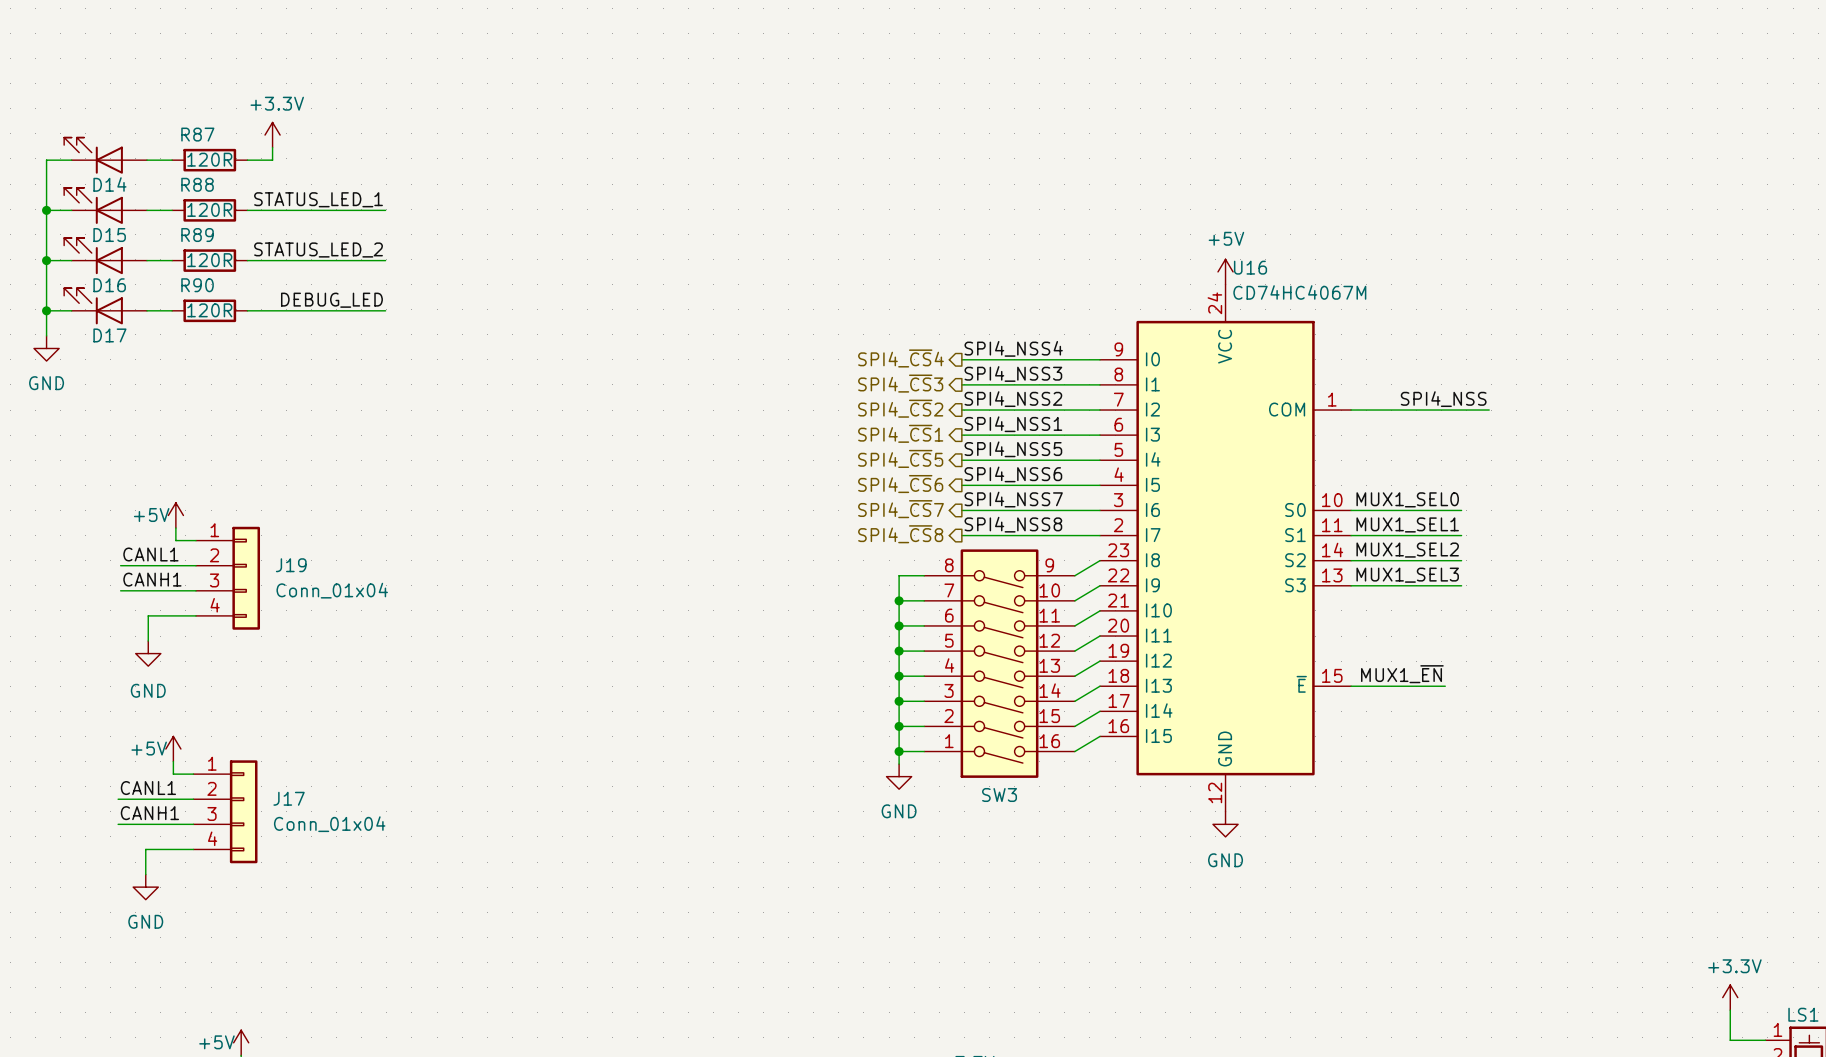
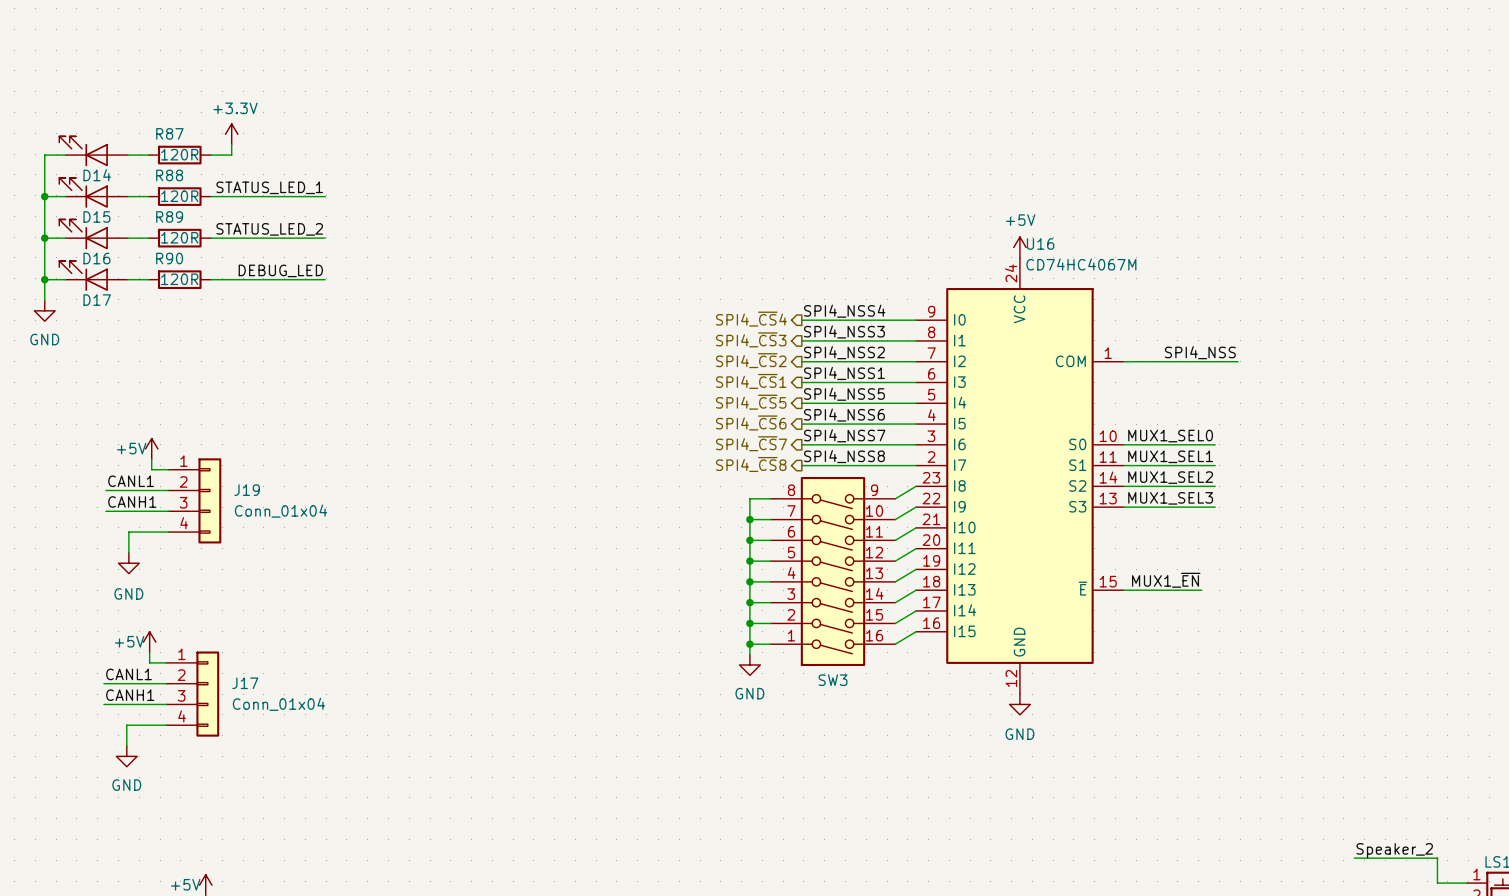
power symbol: +3.3V (1730, 997) -> none
label: none -> Speaker_2 (1394, 850)
wire: none -> (1354, 858) (1437, 858)

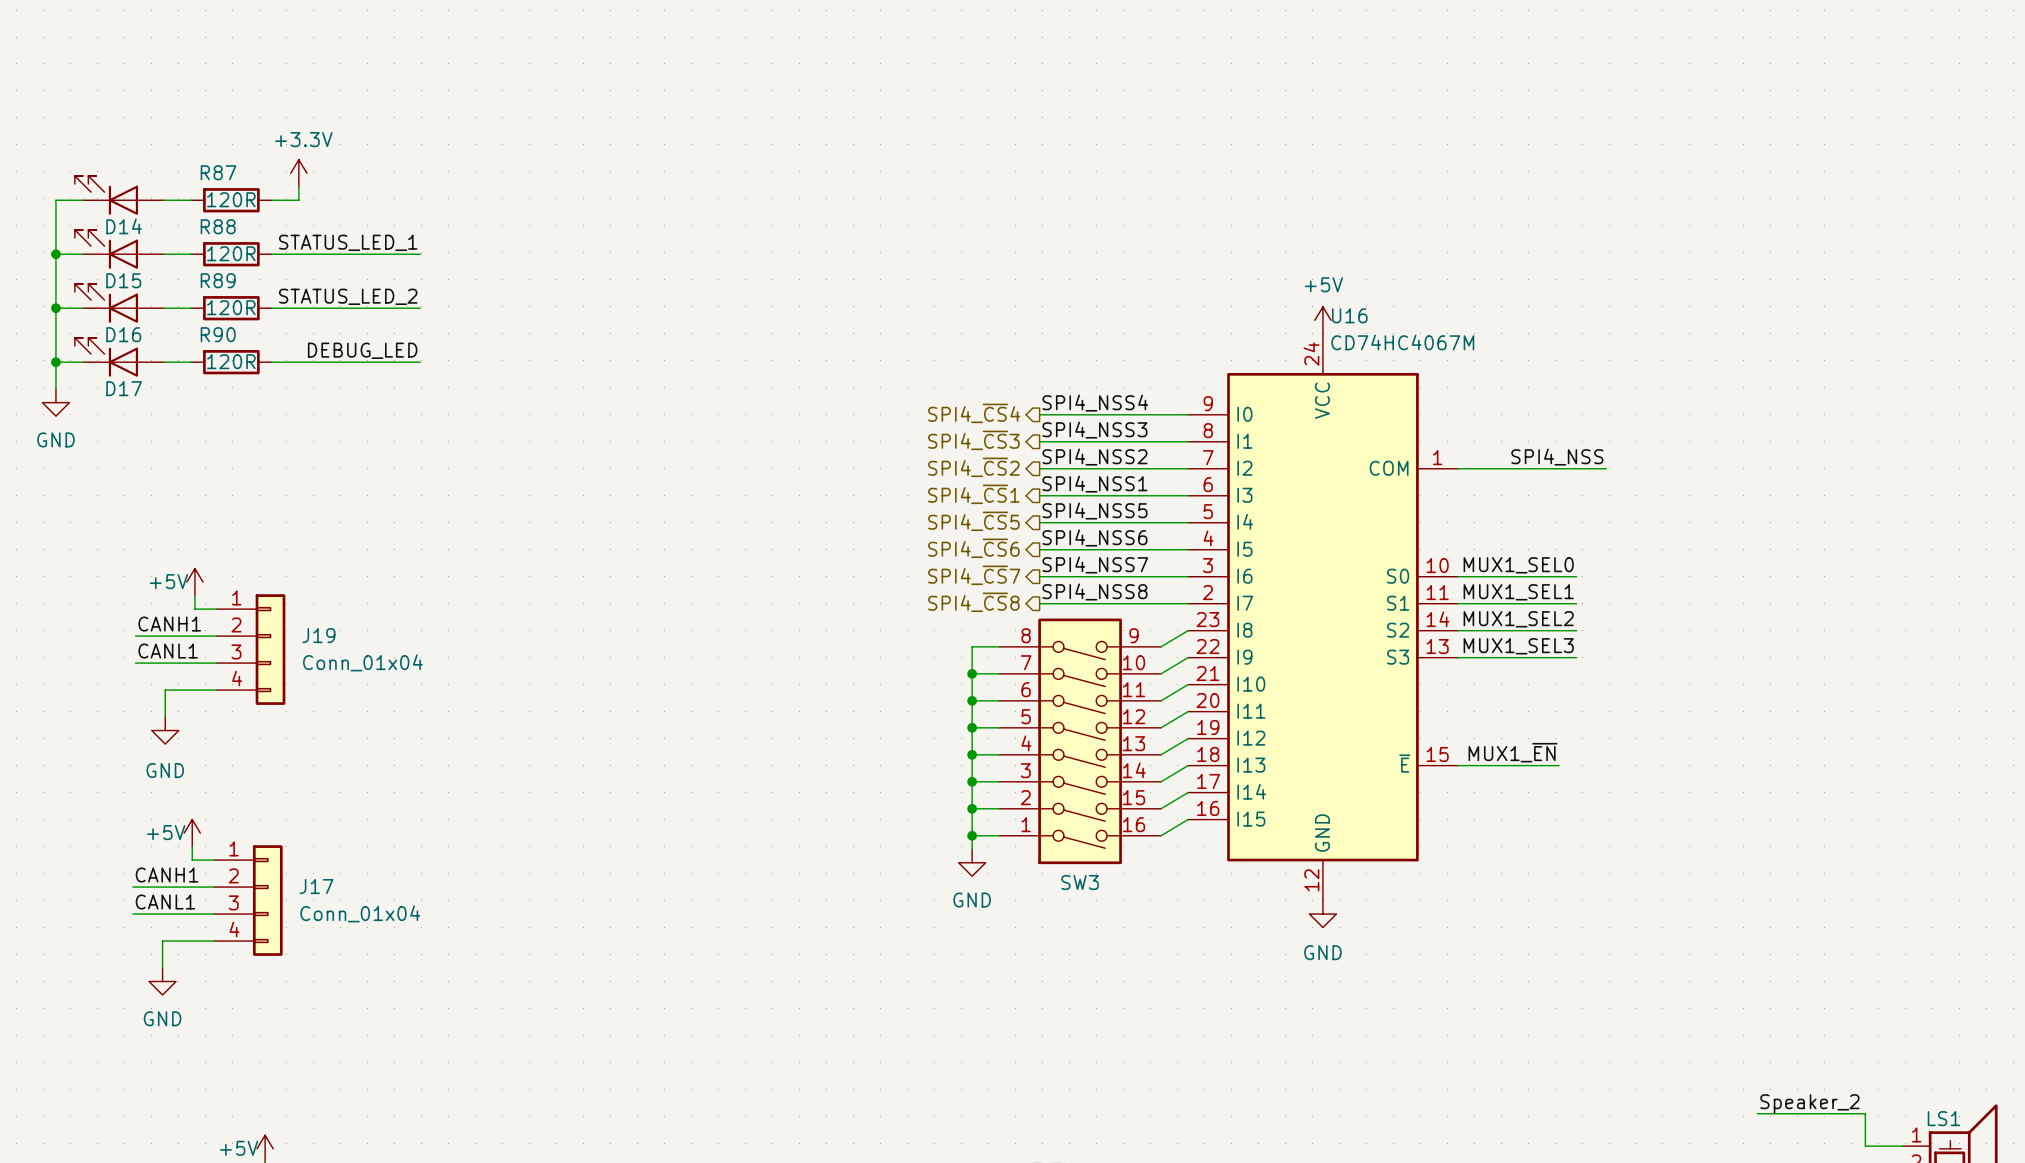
label: CANL1 (131, 481) -> CANH1 (169, 624)
label: CANH1 (132, 502) -> CANL1 (168, 651)
label: CANL1 (129, 674) -> CANH1 (167, 875)
label: CANH1 (130, 695) -> CANL1 (165, 902)

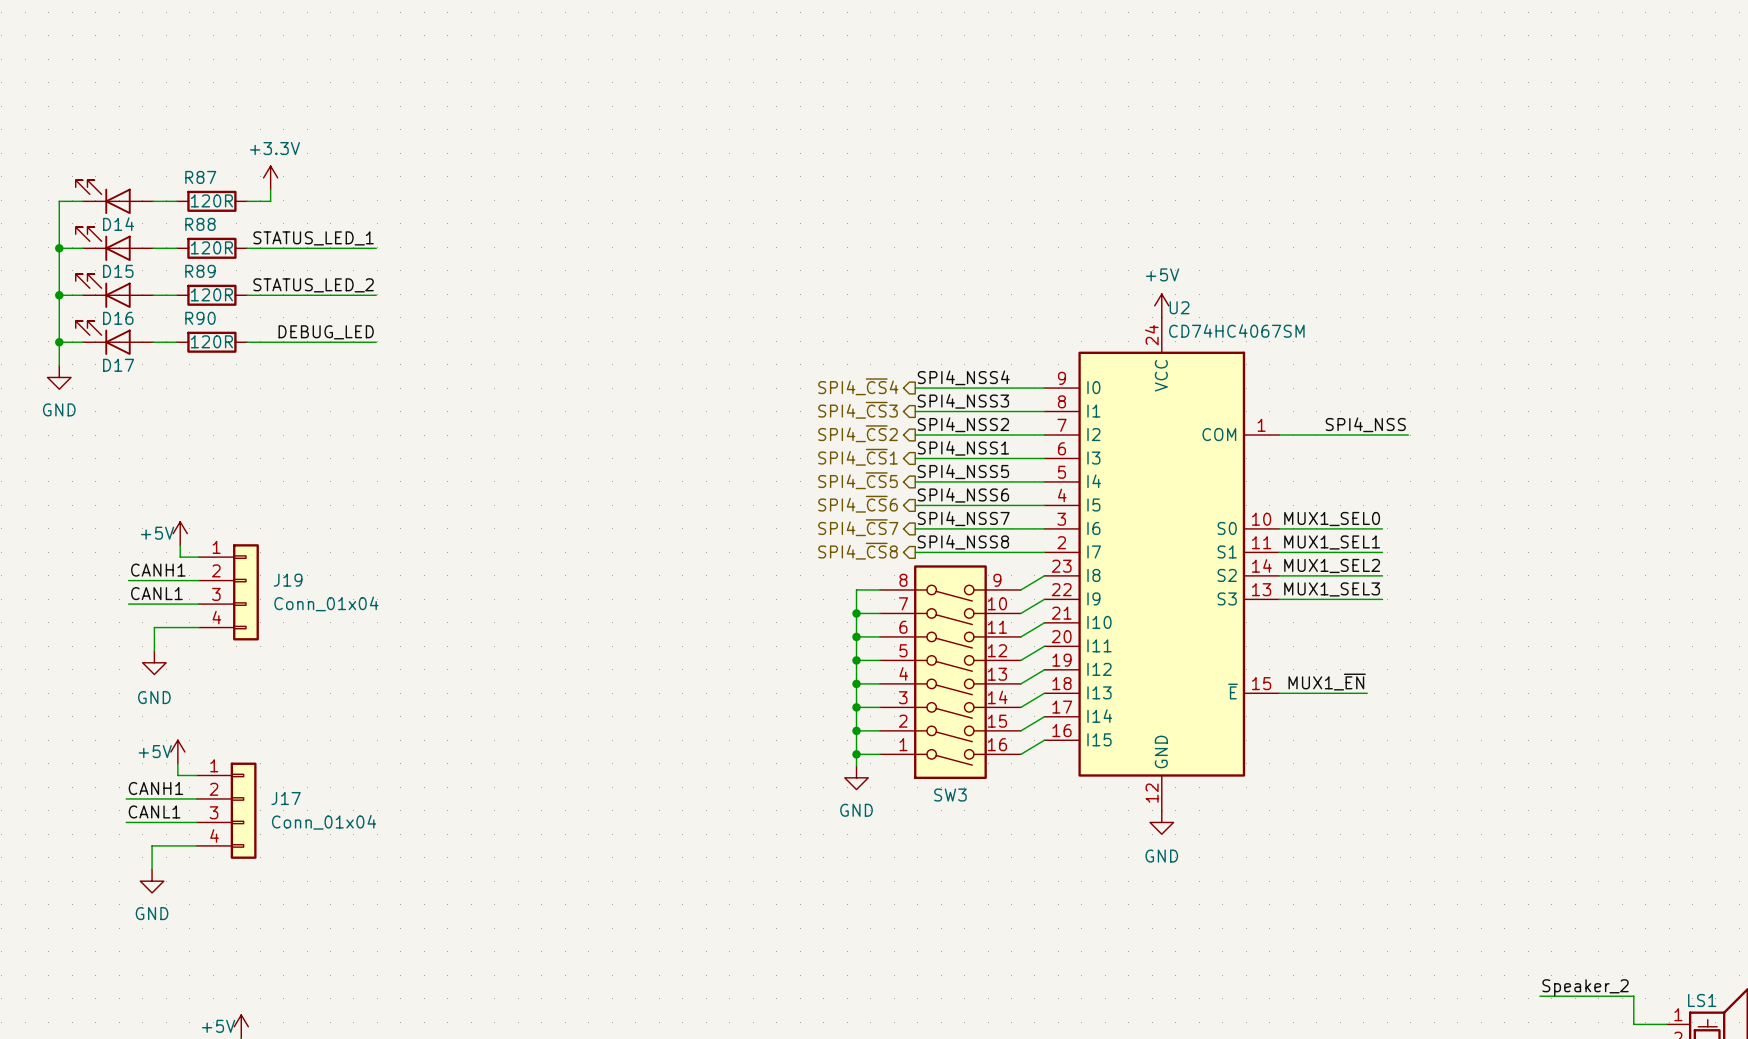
U16 name: U16 (1349, 315) -> U2 (1179, 307)
U16 value: CD74HC4067M (1402, 342) -> CD74HC4067SM (1236, 330)

